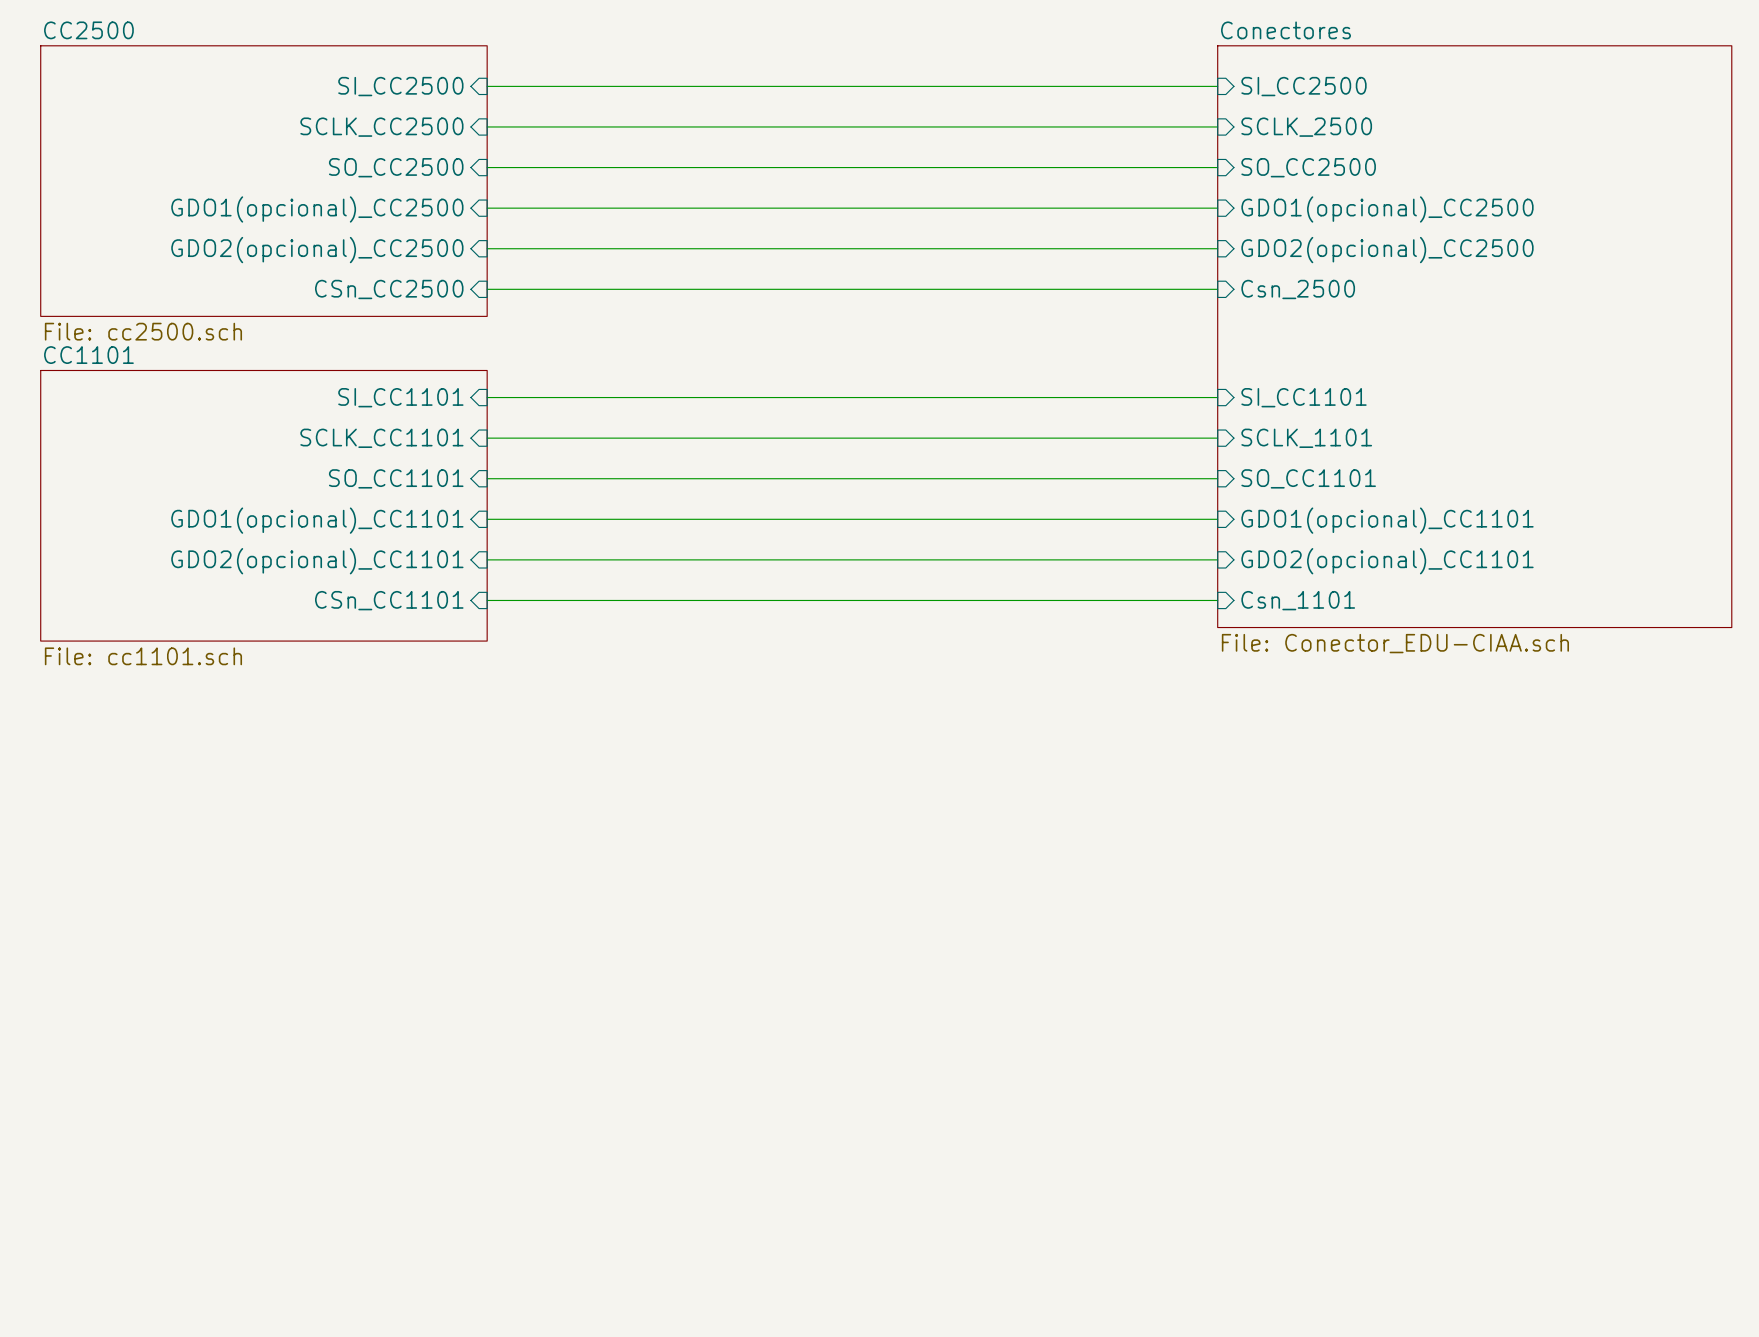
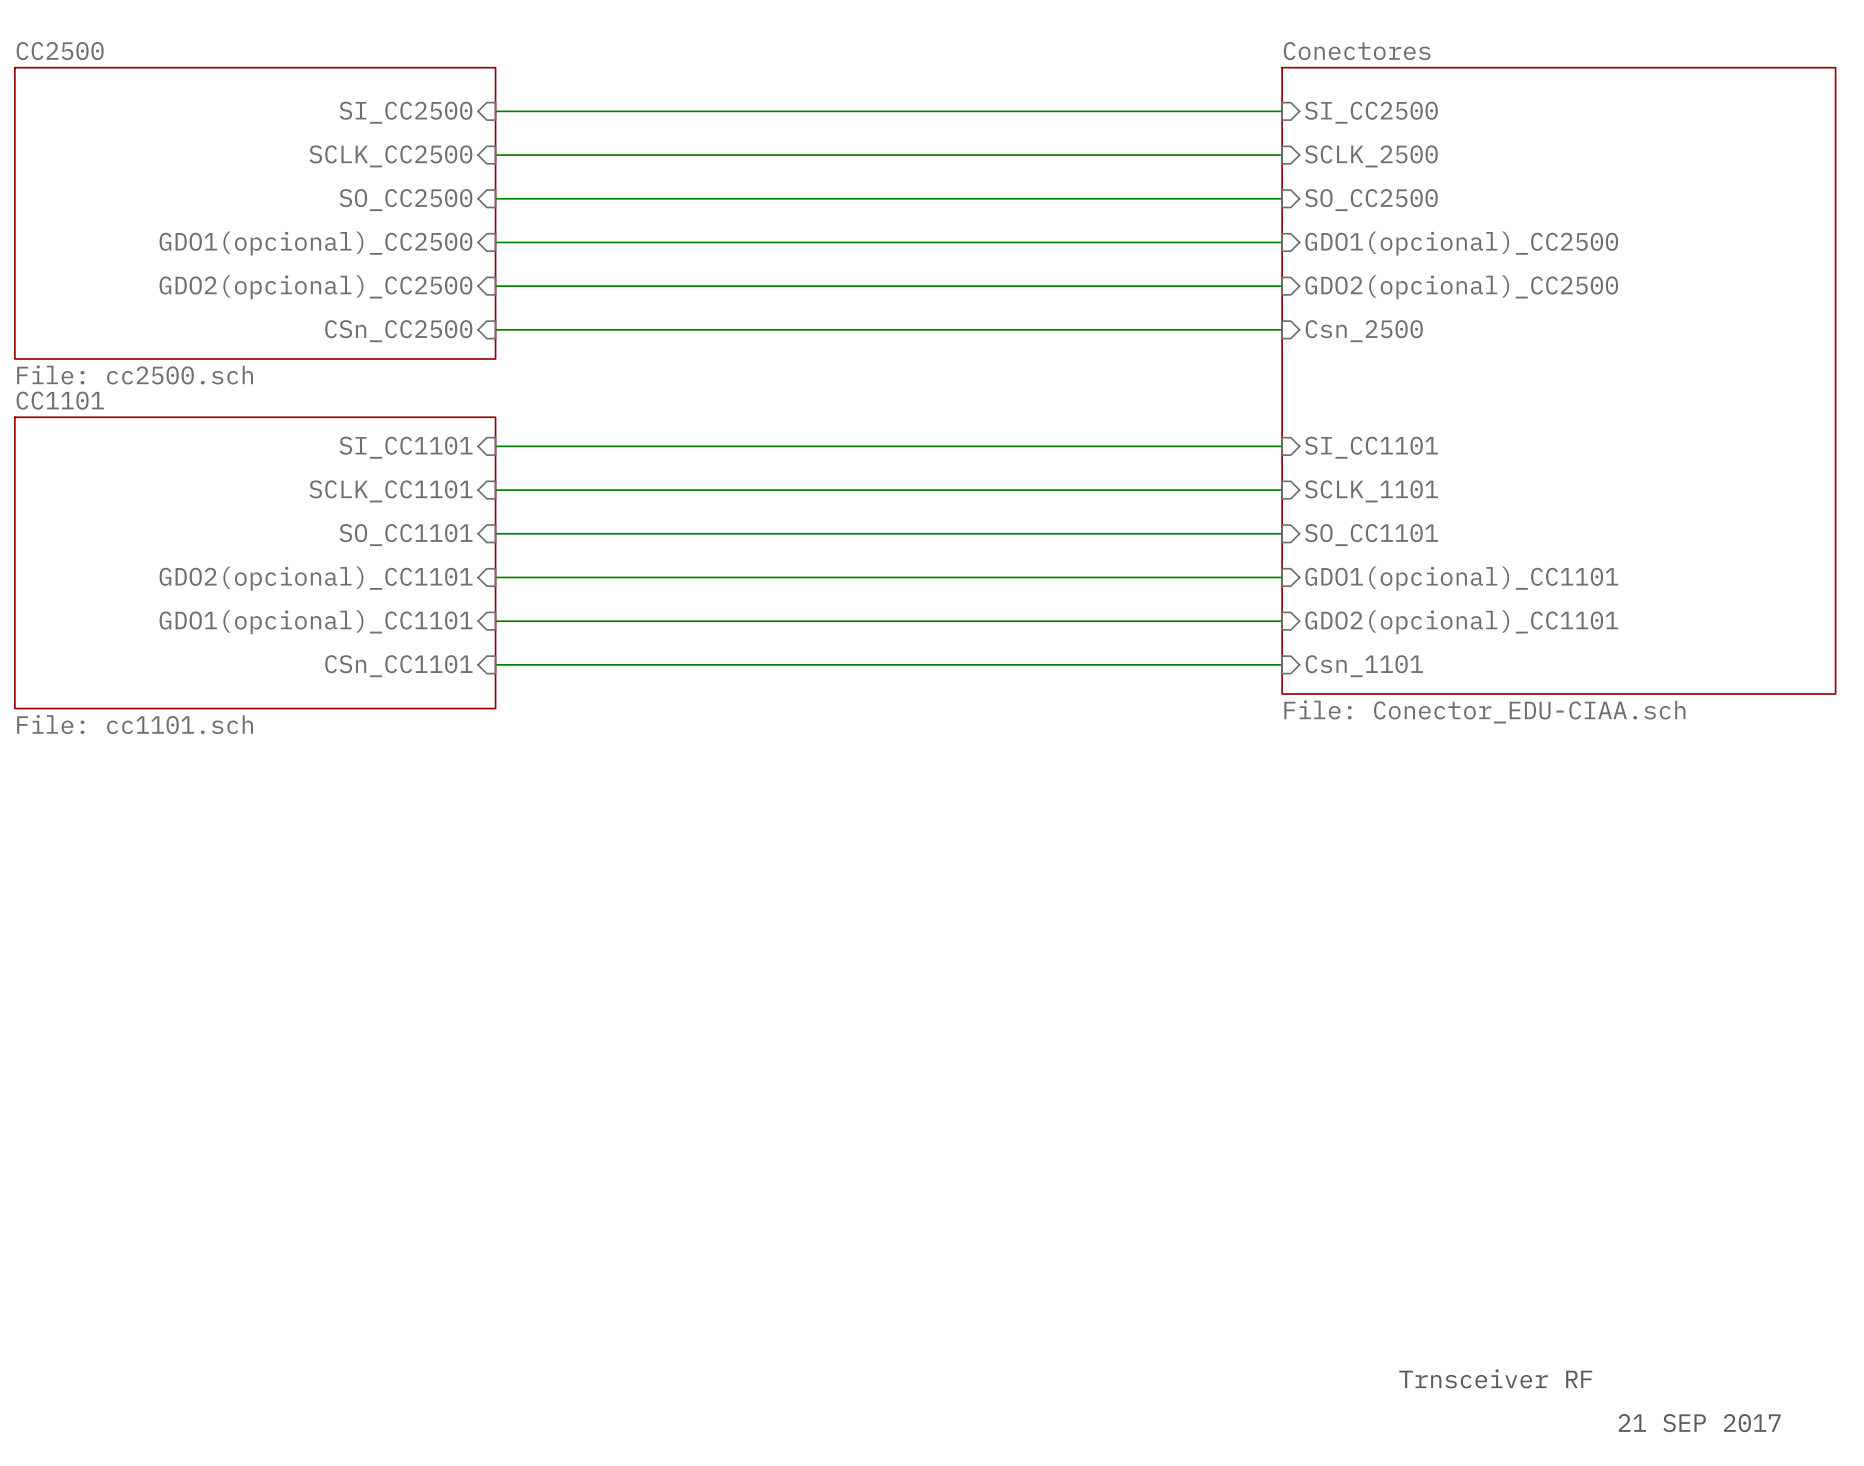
sheet pin: GDO1(opcional)_CC1101 (317, 520) -> GDO2(opcional)_CC1101 (316, 578)
sheet pin: GDO2(opcional)_CC1101 (317, 561) -> GDO1(opcional)_CC1101 (316, 622)
text: none -> Trnsceiver RF (1495, 1378)
text: none -> 21 SEP 2017 (1699, 1423)

